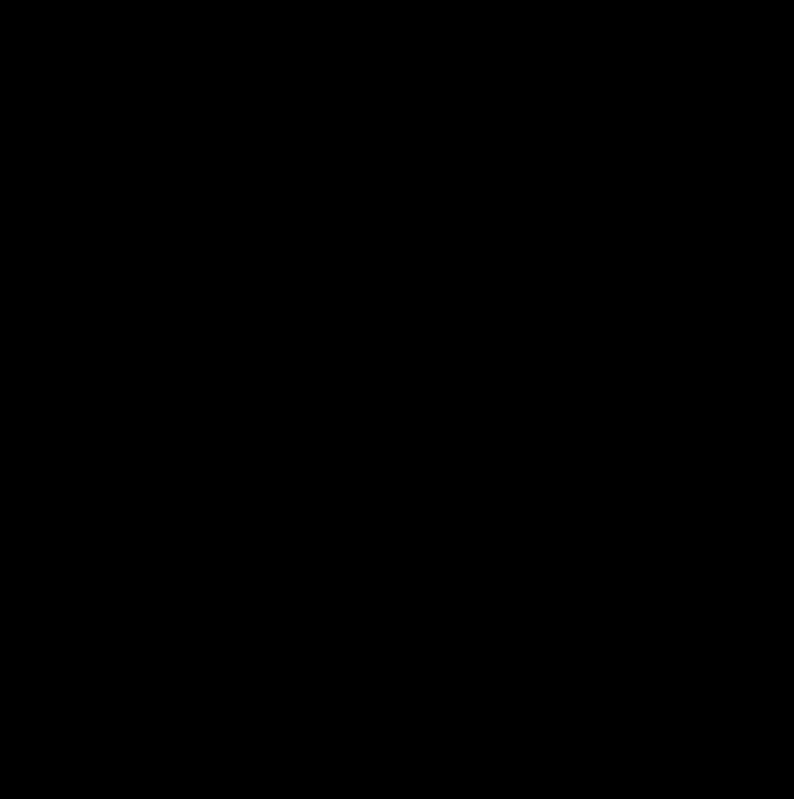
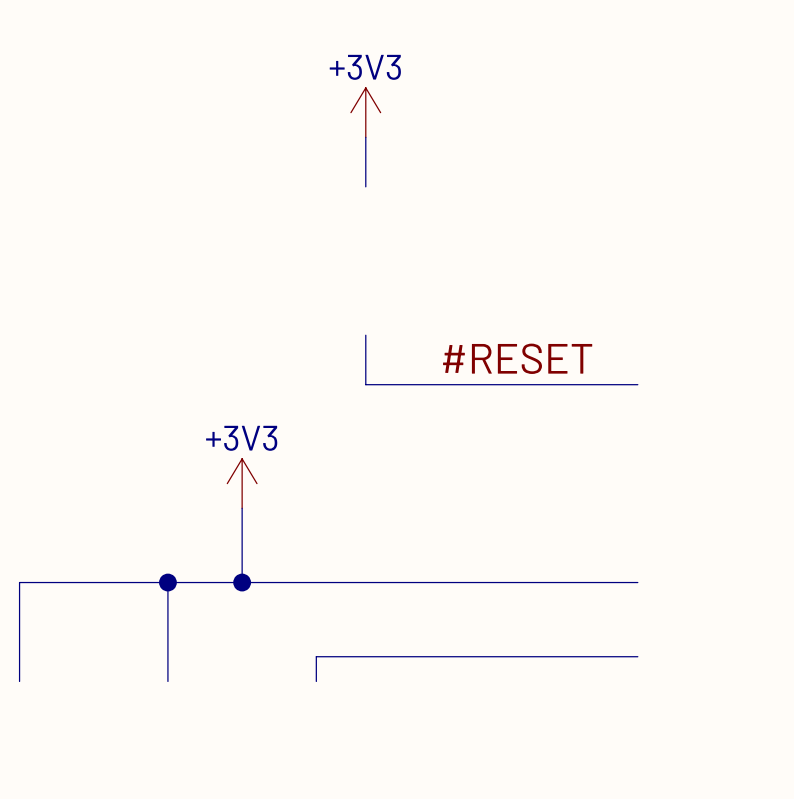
power symbol: none -> +3V3 (365, 112)
wire: none -> (365, 137) (365, 186)
wire: none -> (365, 335) (365, 384) (637, 384)
label: none -> #RESET (517, 358)
power symbol: none -> +3V3 (242, 483)
wire: none -> (242, 508) (242, 582)
wire: none -> (167, 582) (167, 681)
junction: none -> (167, 582)
junction: none -> (242, 582)
wire: none -> (637, 582) (19, 582) (19, 681)
wire: none -> (637, 656) (316, 656) (316, 681)

